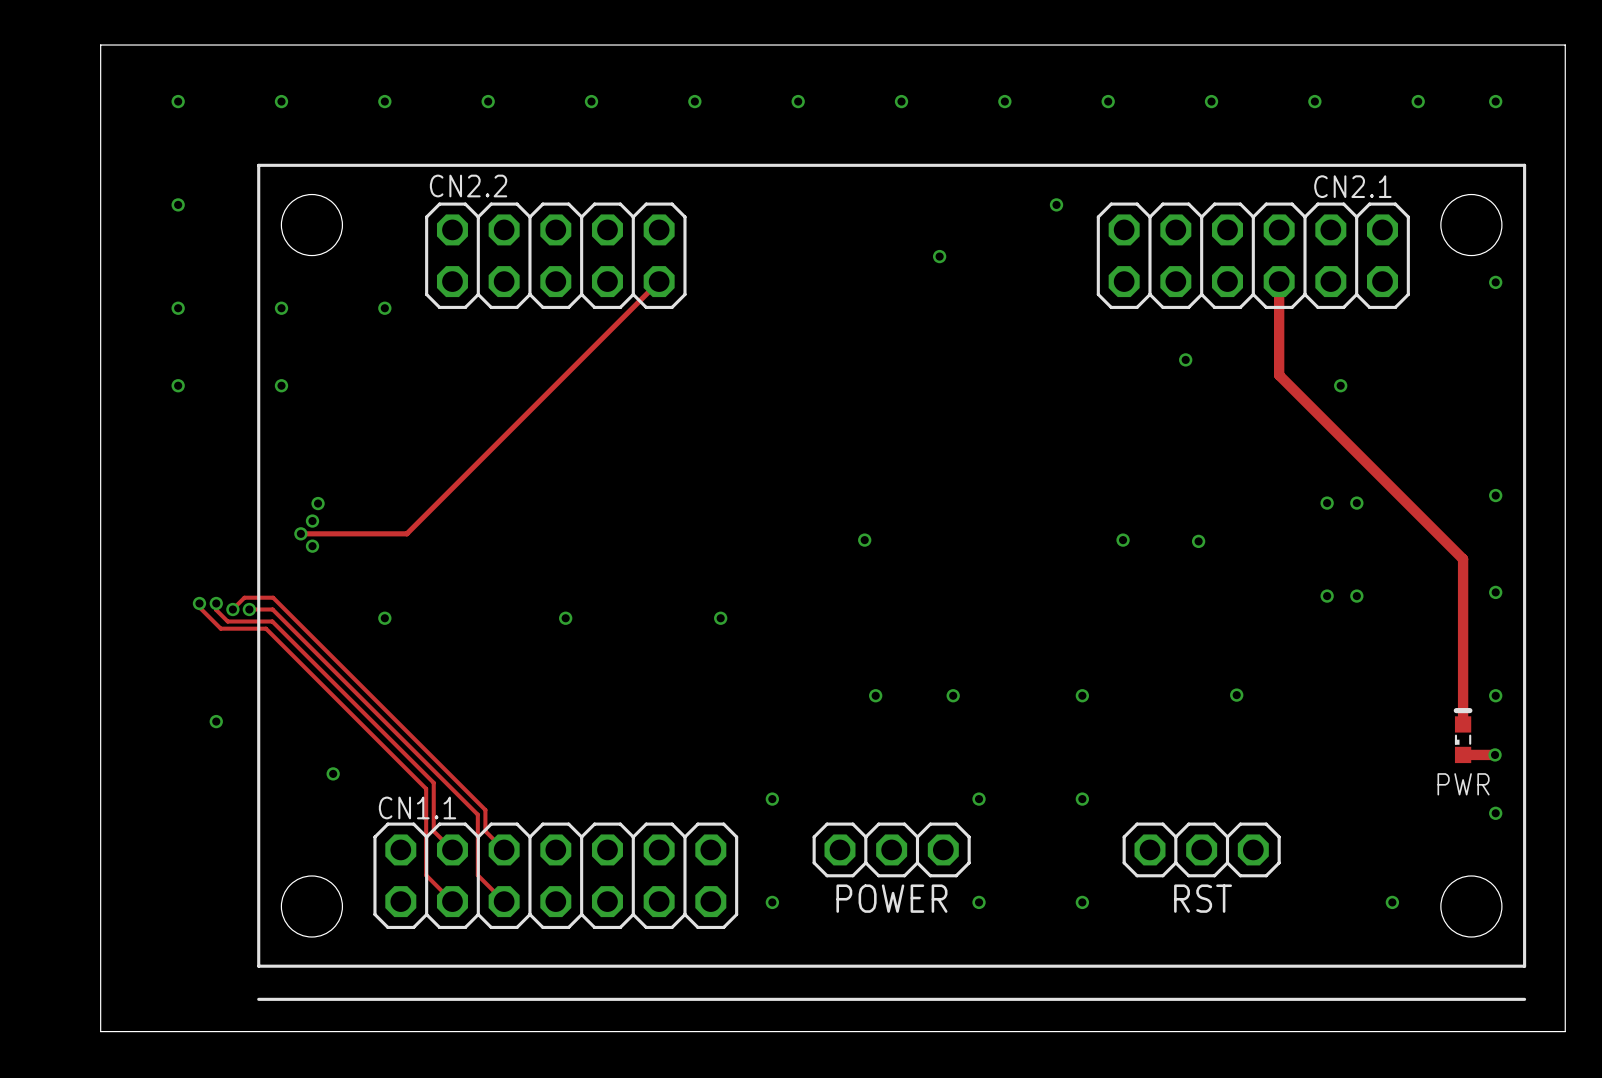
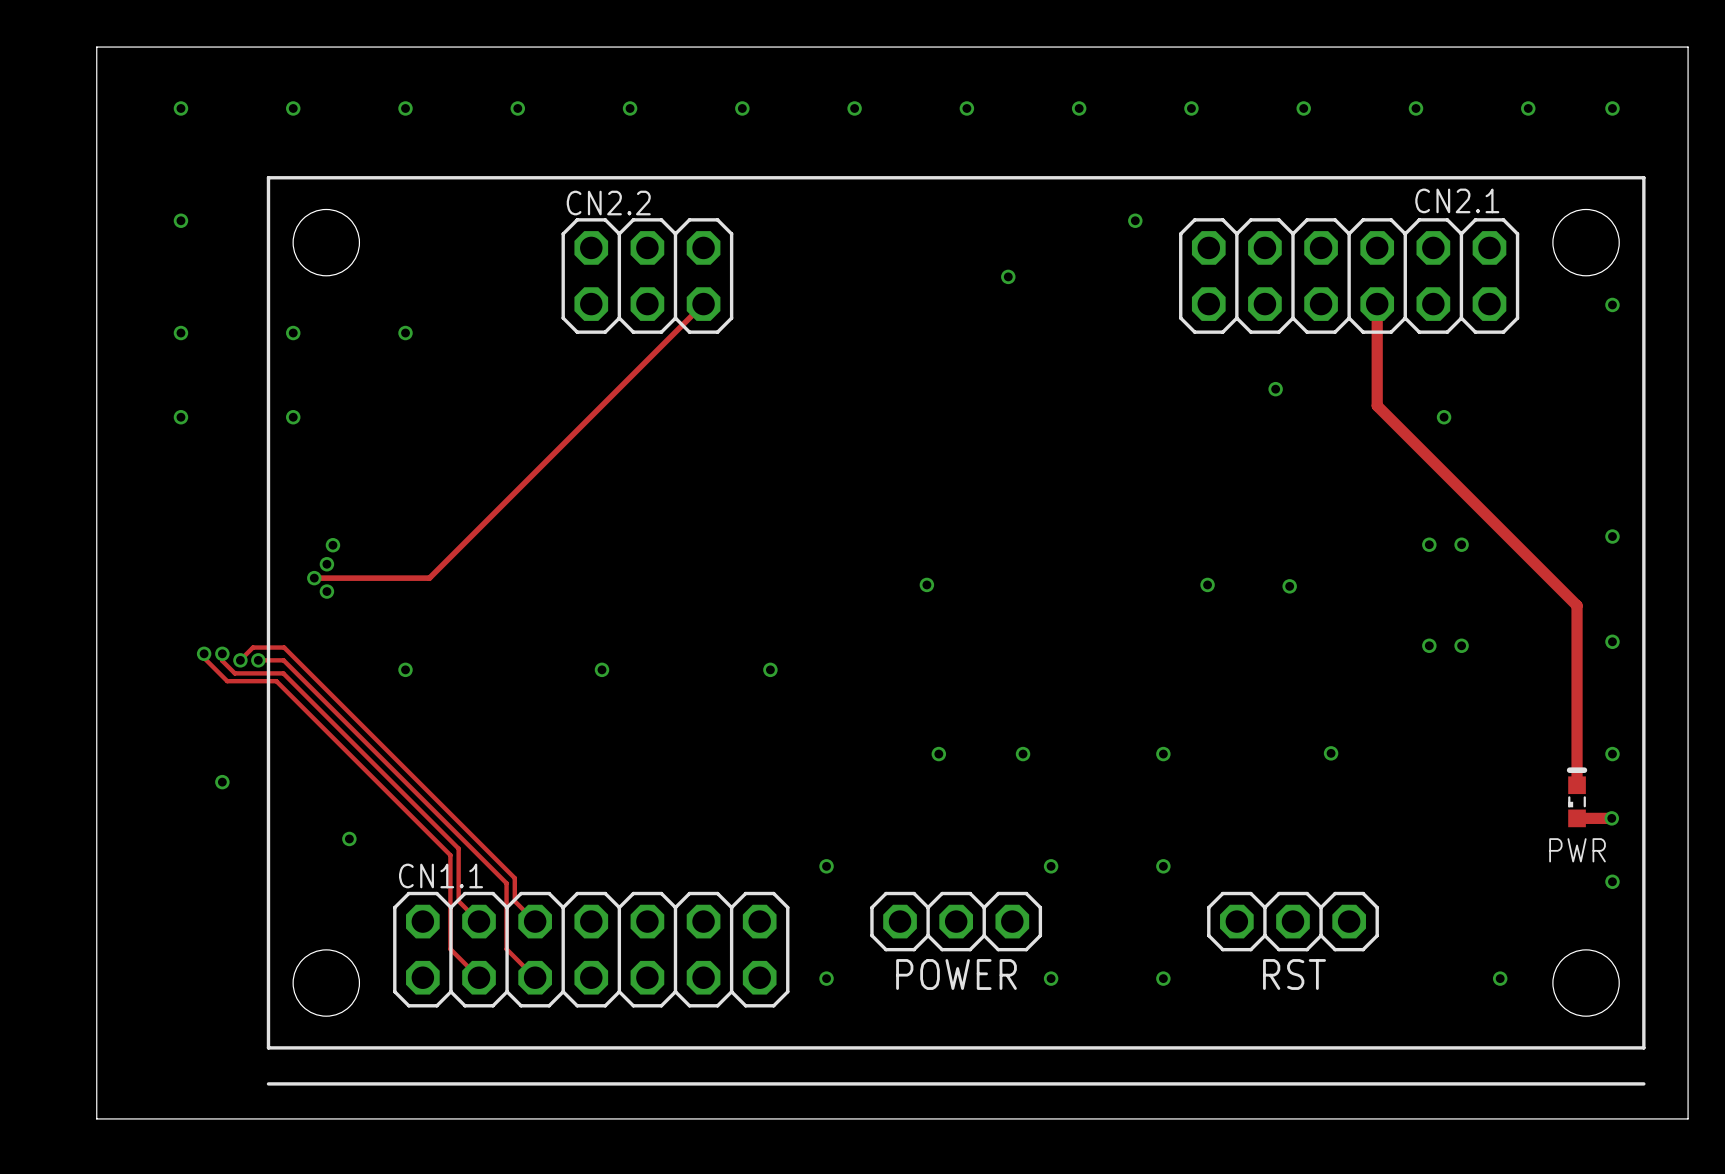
CN2.2 name position: CN2.2 (468, 186) -> CN2.2 (608, 203)
CN2.2 footprint: [425, 202, 687, 309] -> [561, 218, 734, 334]

